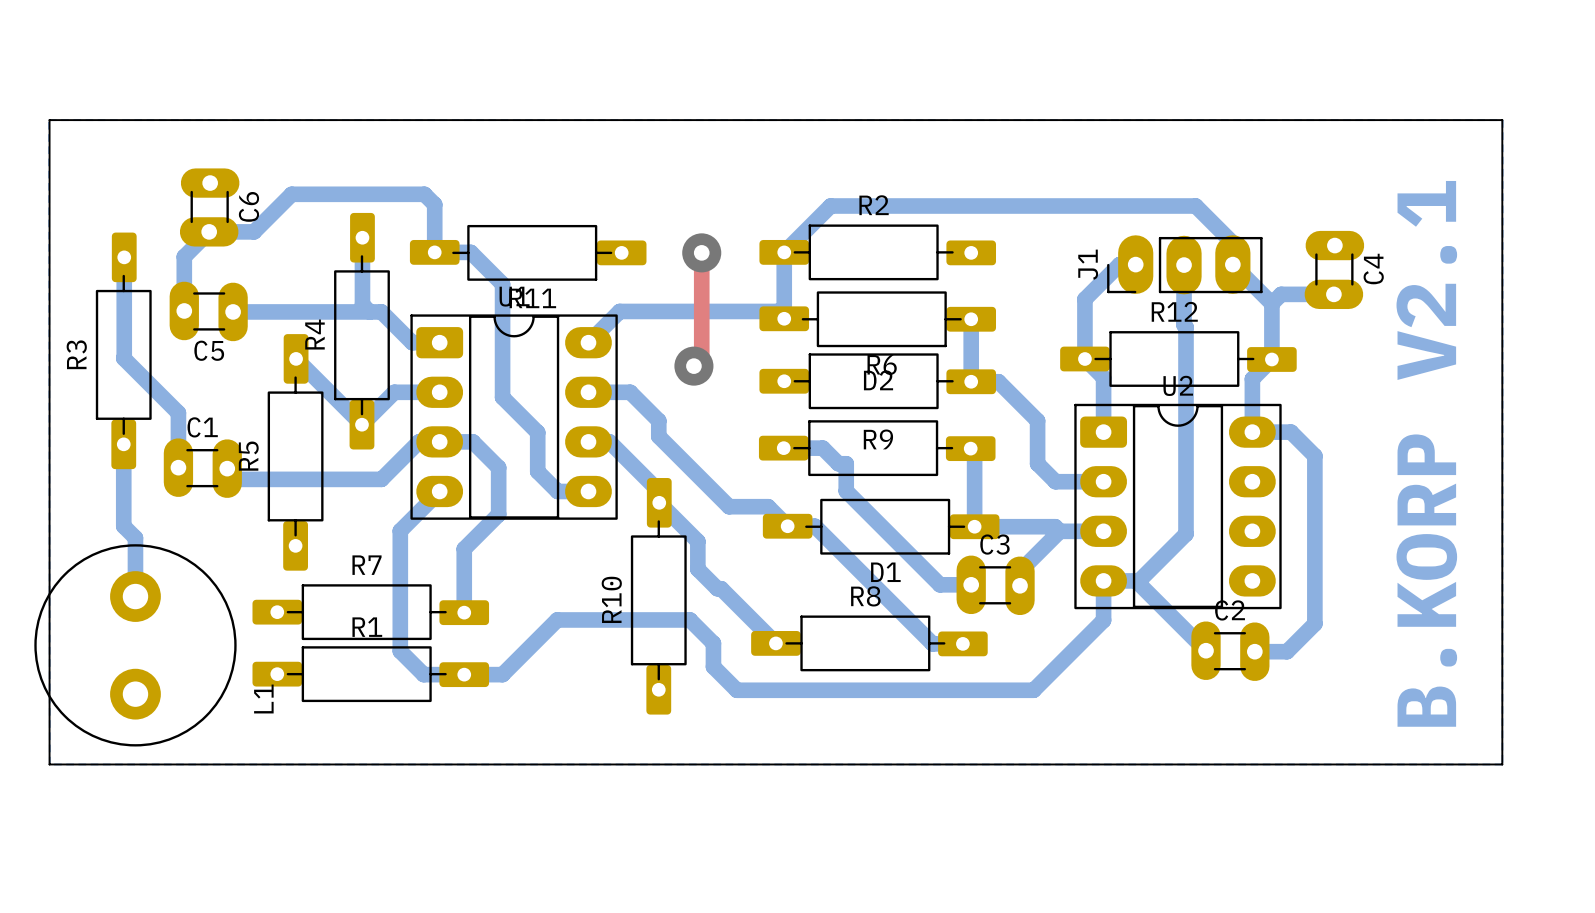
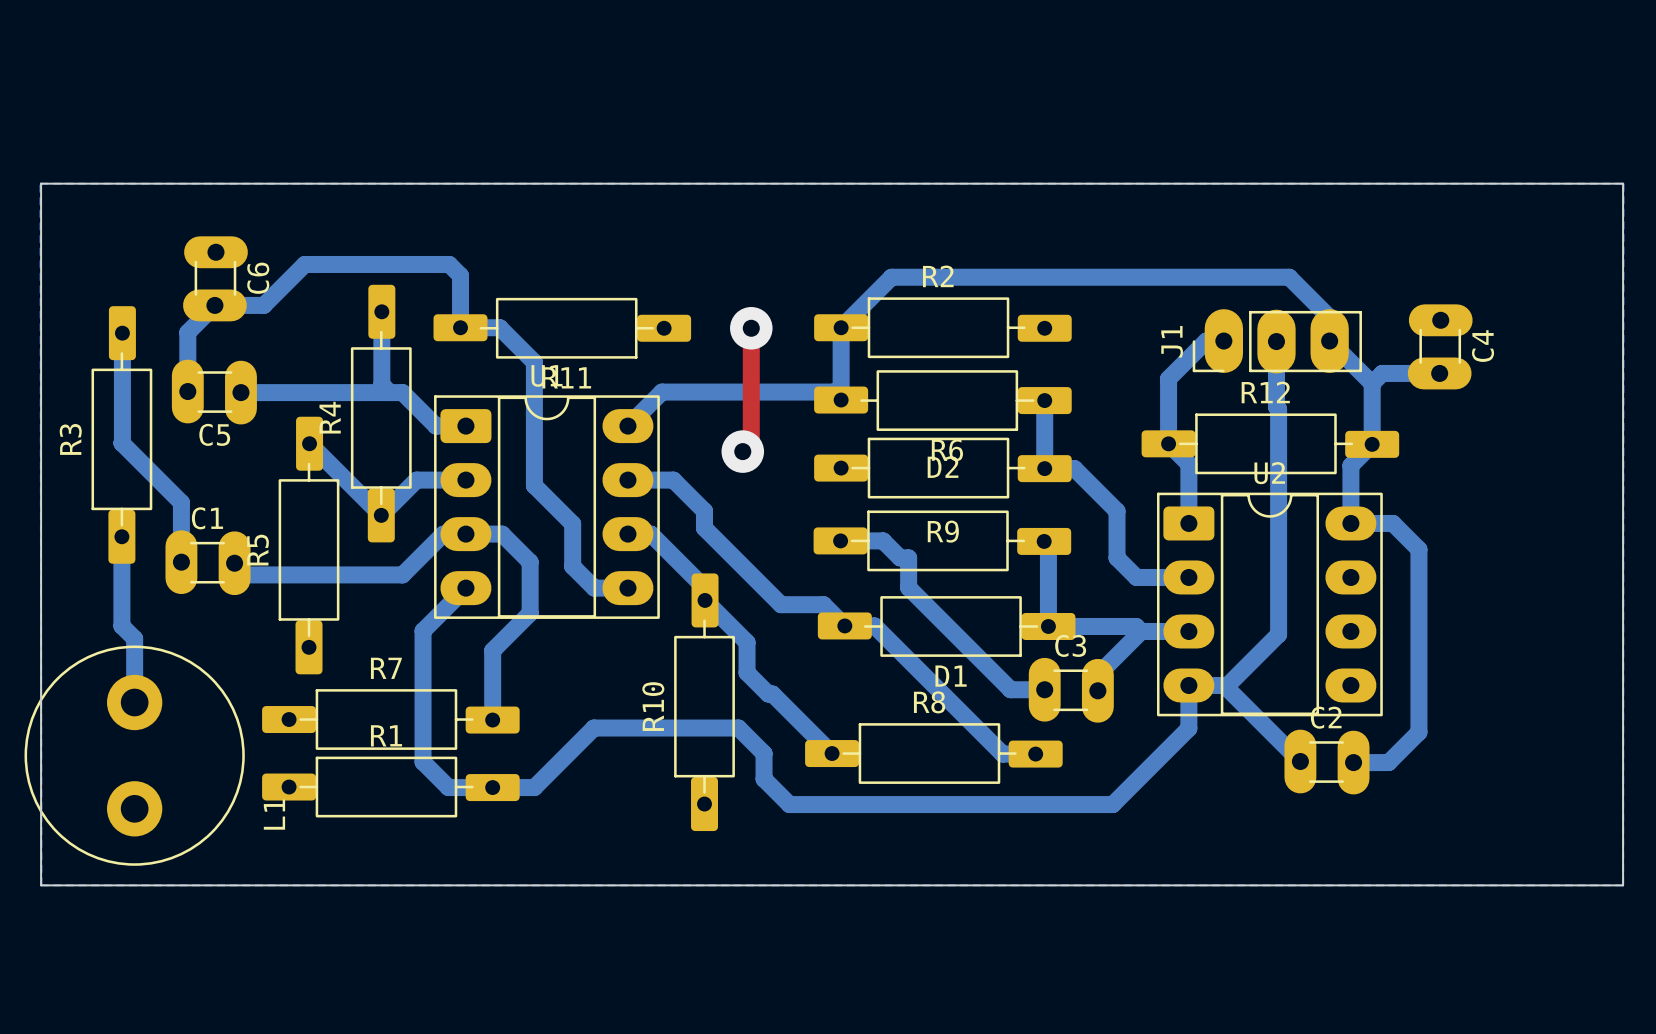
text: B.KORP V2.1 (1426, 453) -> none

